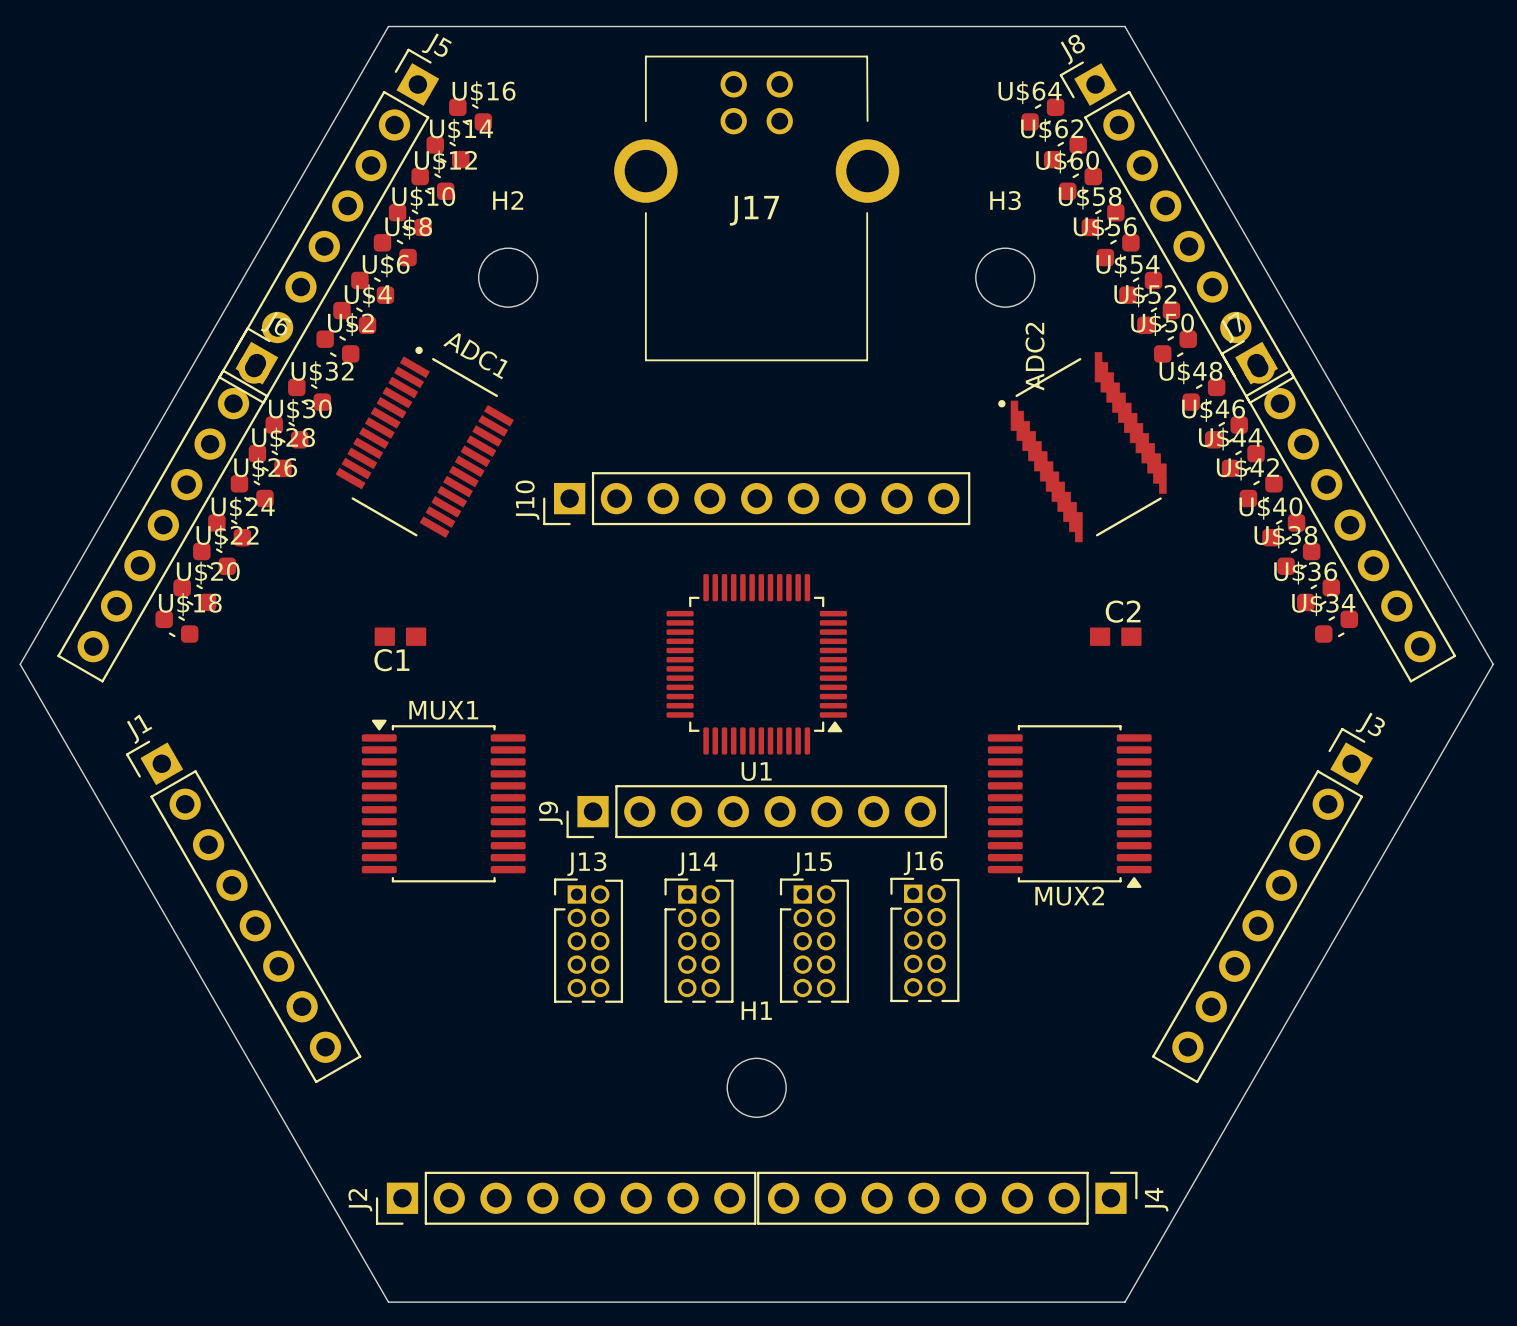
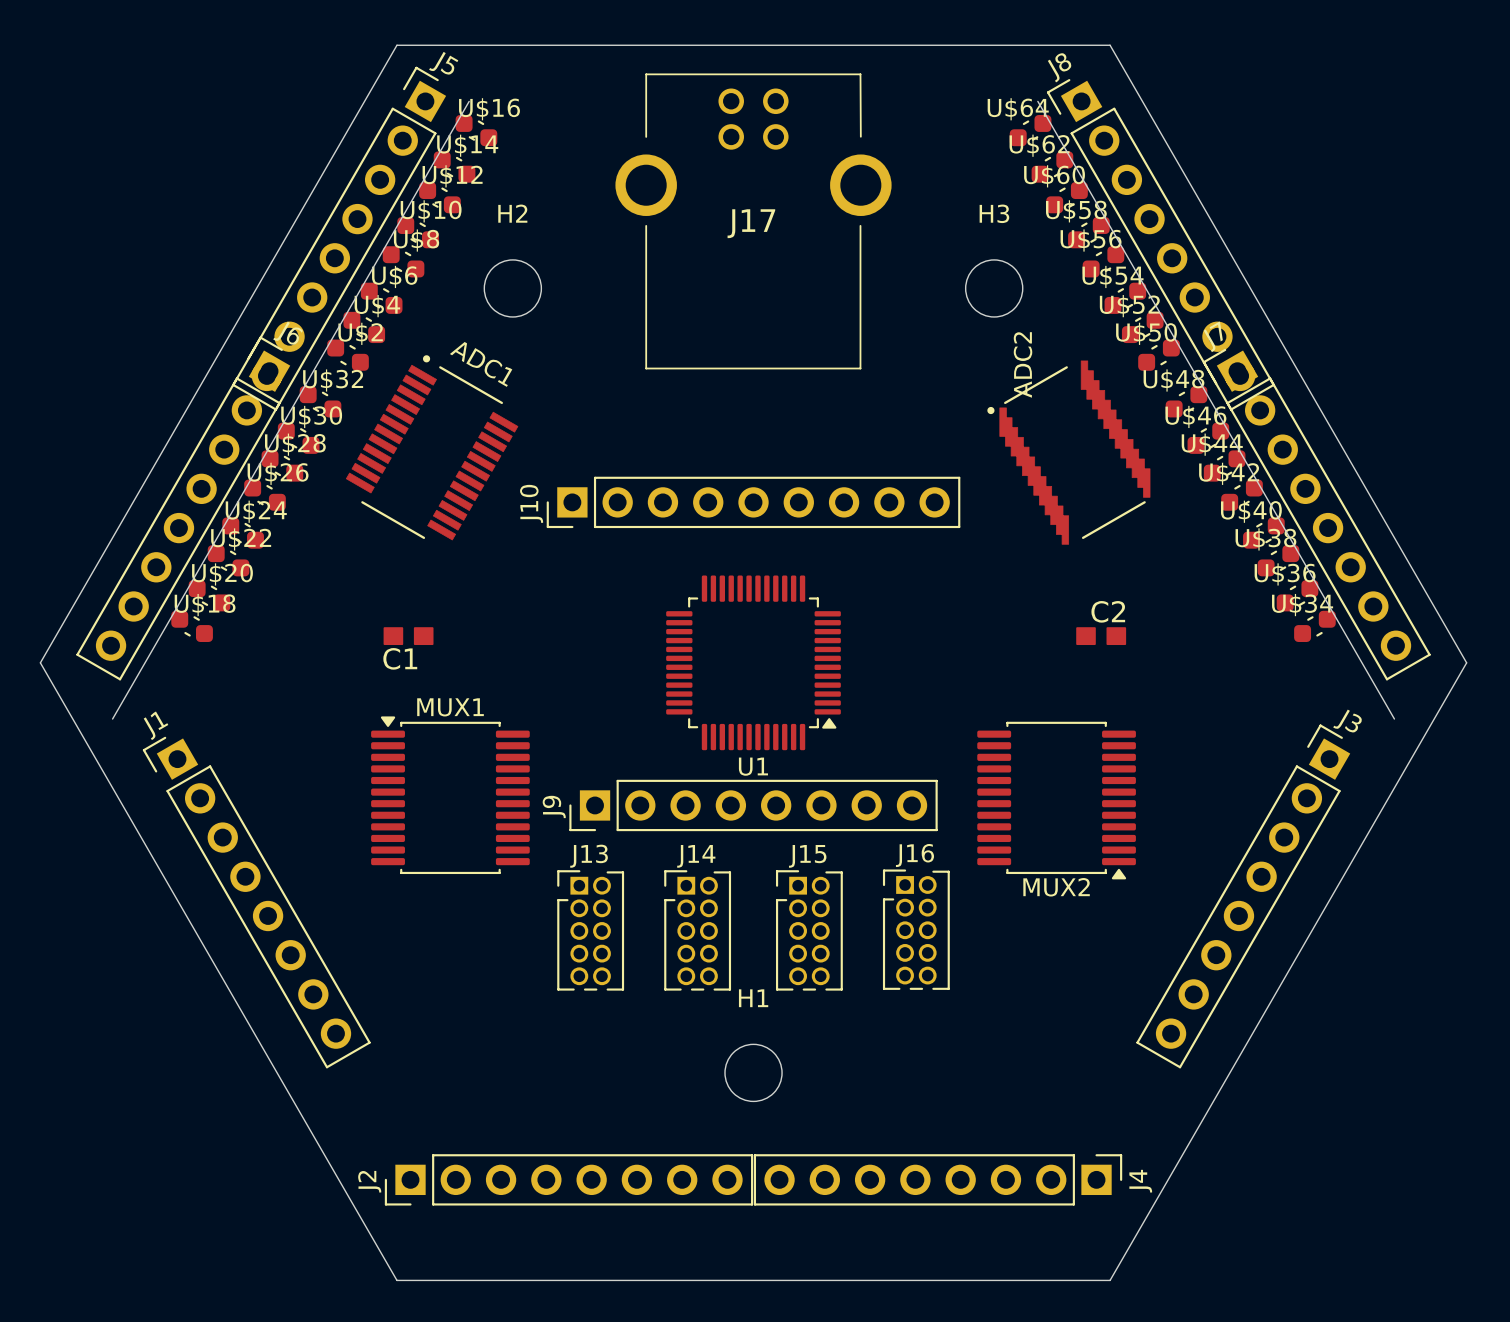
board edge: none -> (469, 101) (112, 719)
board edge: none -> (1037, 101) (1394, 719)

